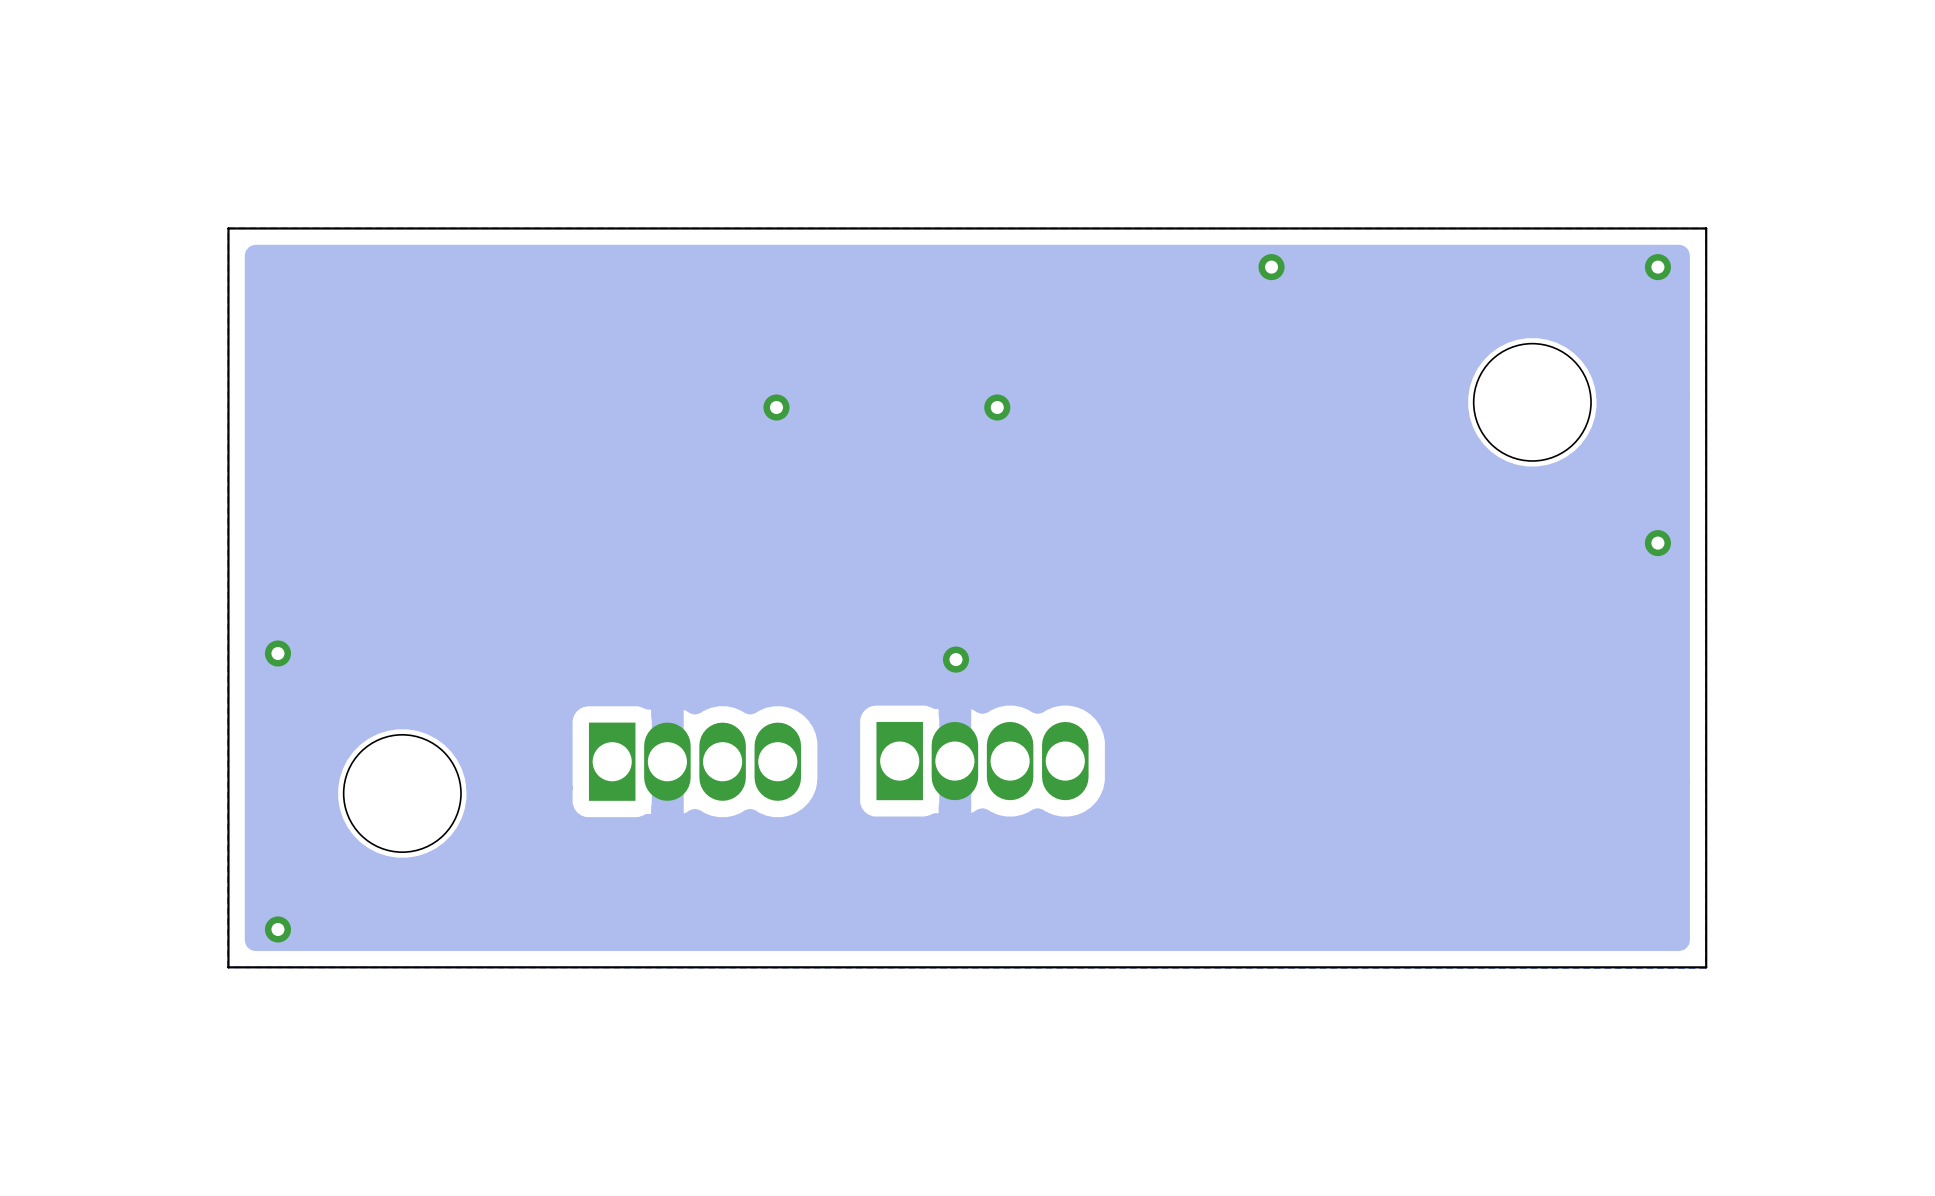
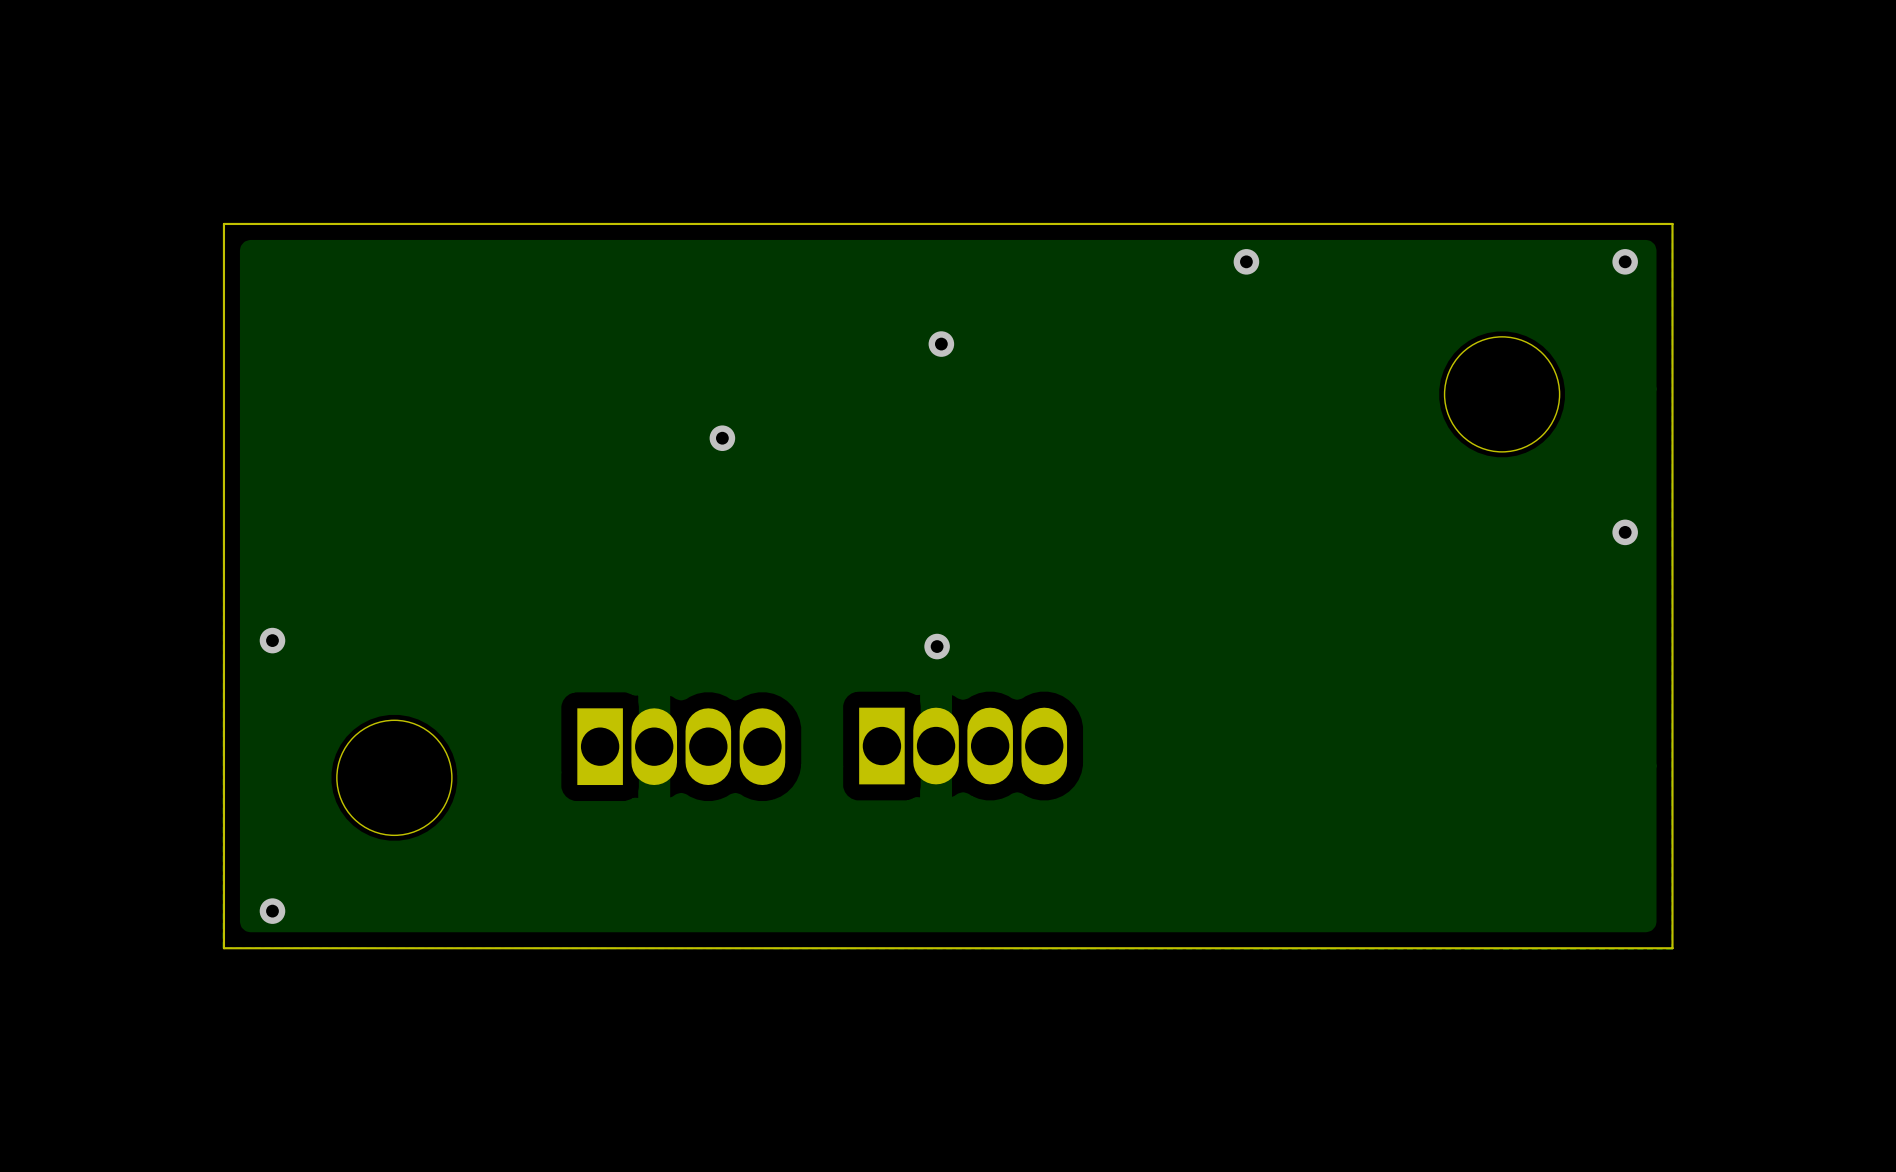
via position: (776, 407) -> (722, 438)
via position: (997, 407) -> (941, 344)

